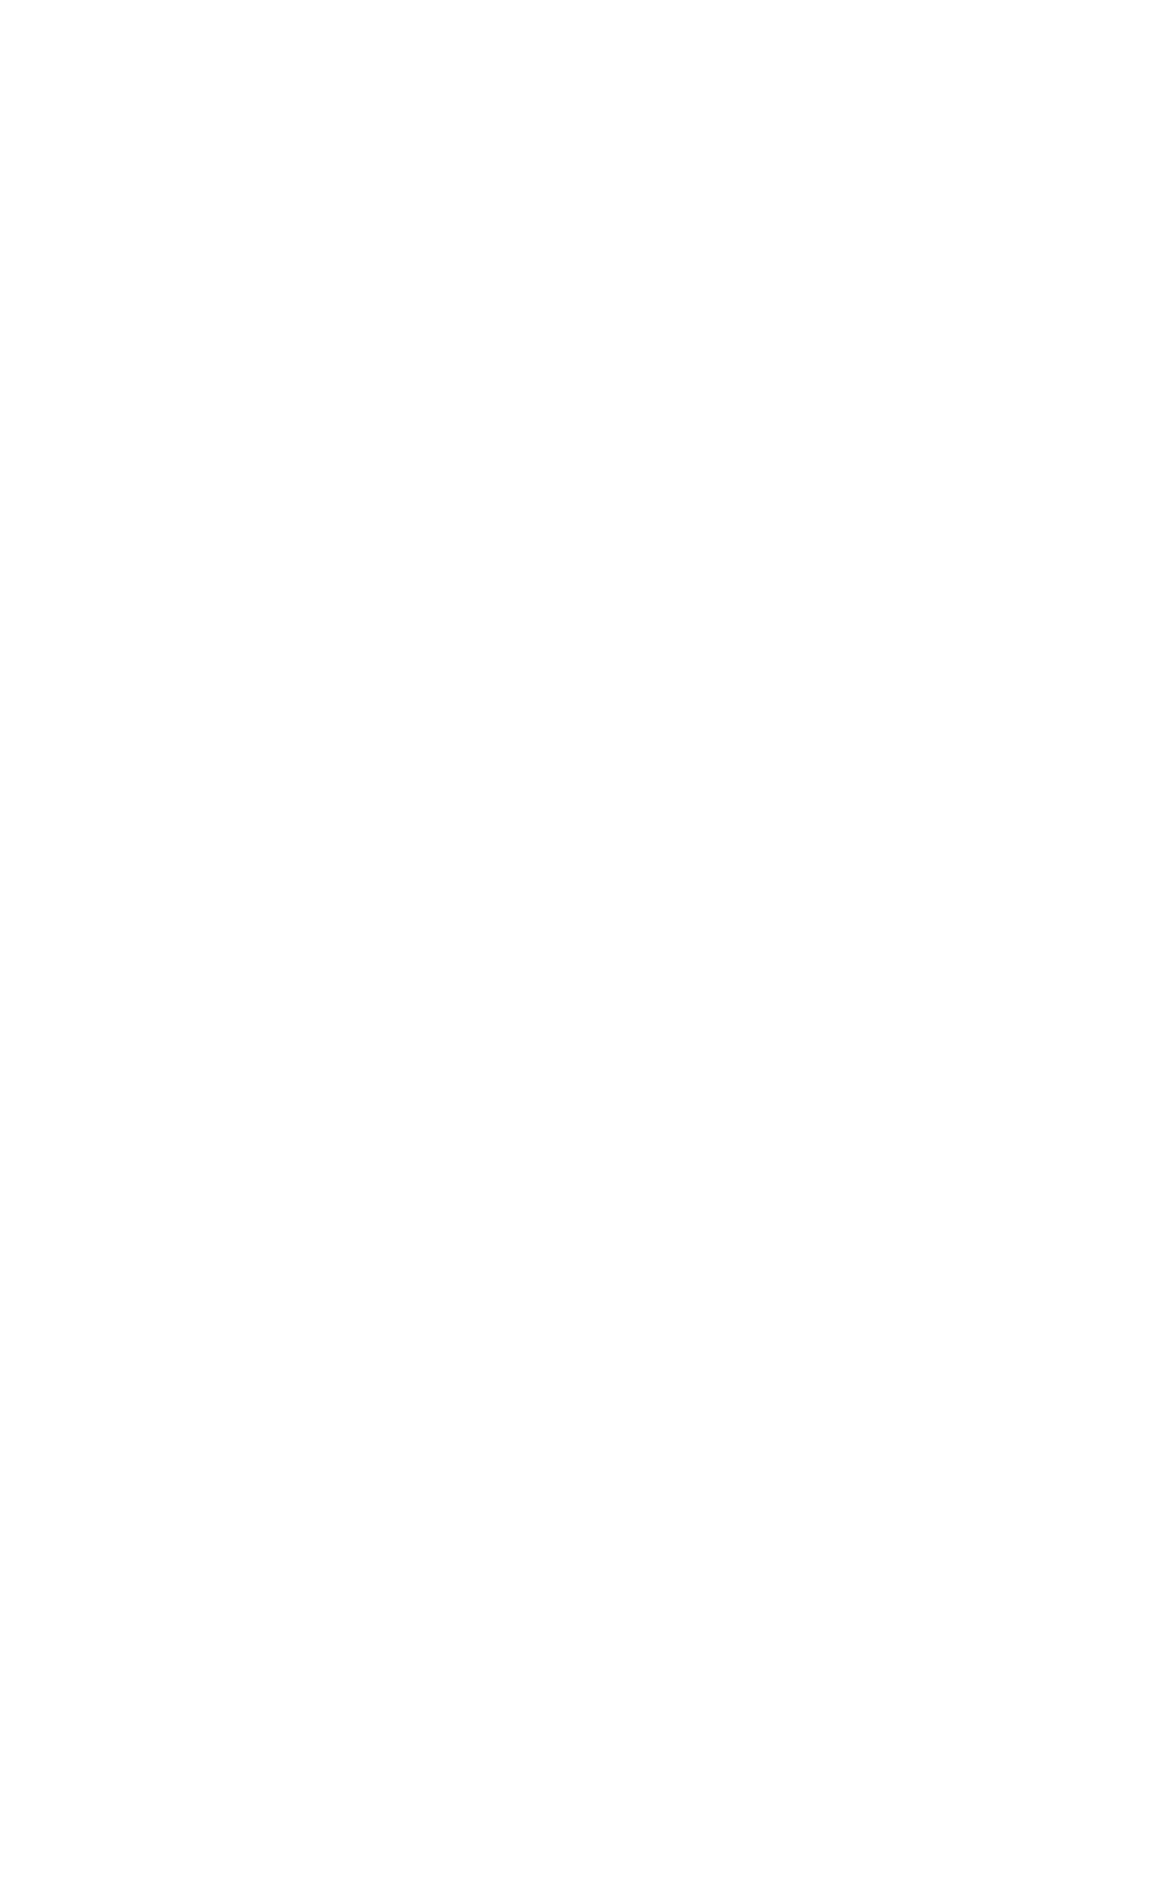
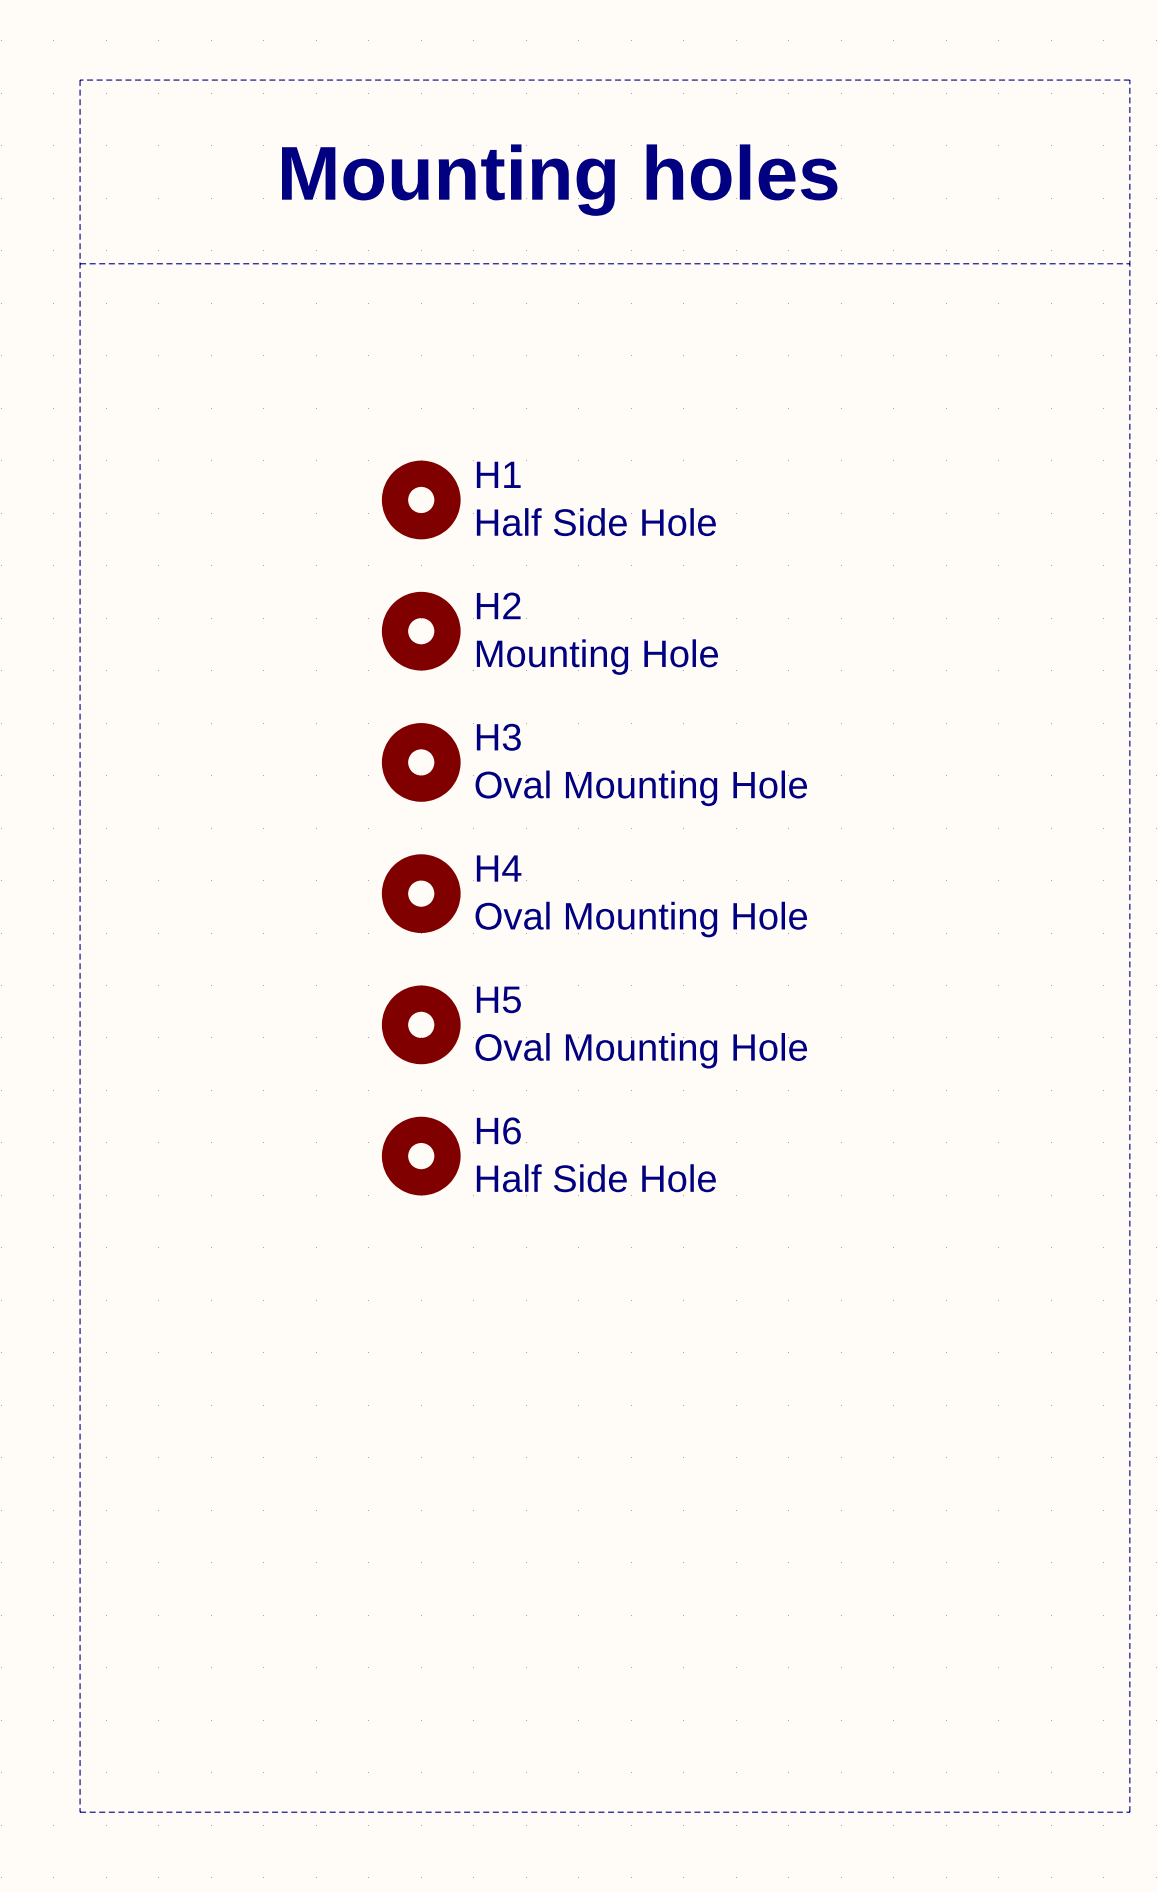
line: none -> (80, 80) (1129, 80) (1129, 1812) (80, 1812) (80, 80)
text: none -> Mounting holes (559, 180)
line: none -> (80, 263) (1129, 263)
H1: none -> Half Side Hole (421, 499)
H2: none -> Mounting Hole (421, 631)
H3: none -> Oval Mounting Hole (421, 762)
H4: none -> Oval Mounting Hole (421, 893)
H5: none -> Oval Mounting Hole (421, 1024)
H6: none -> Half Side Hole (421, 1156)

